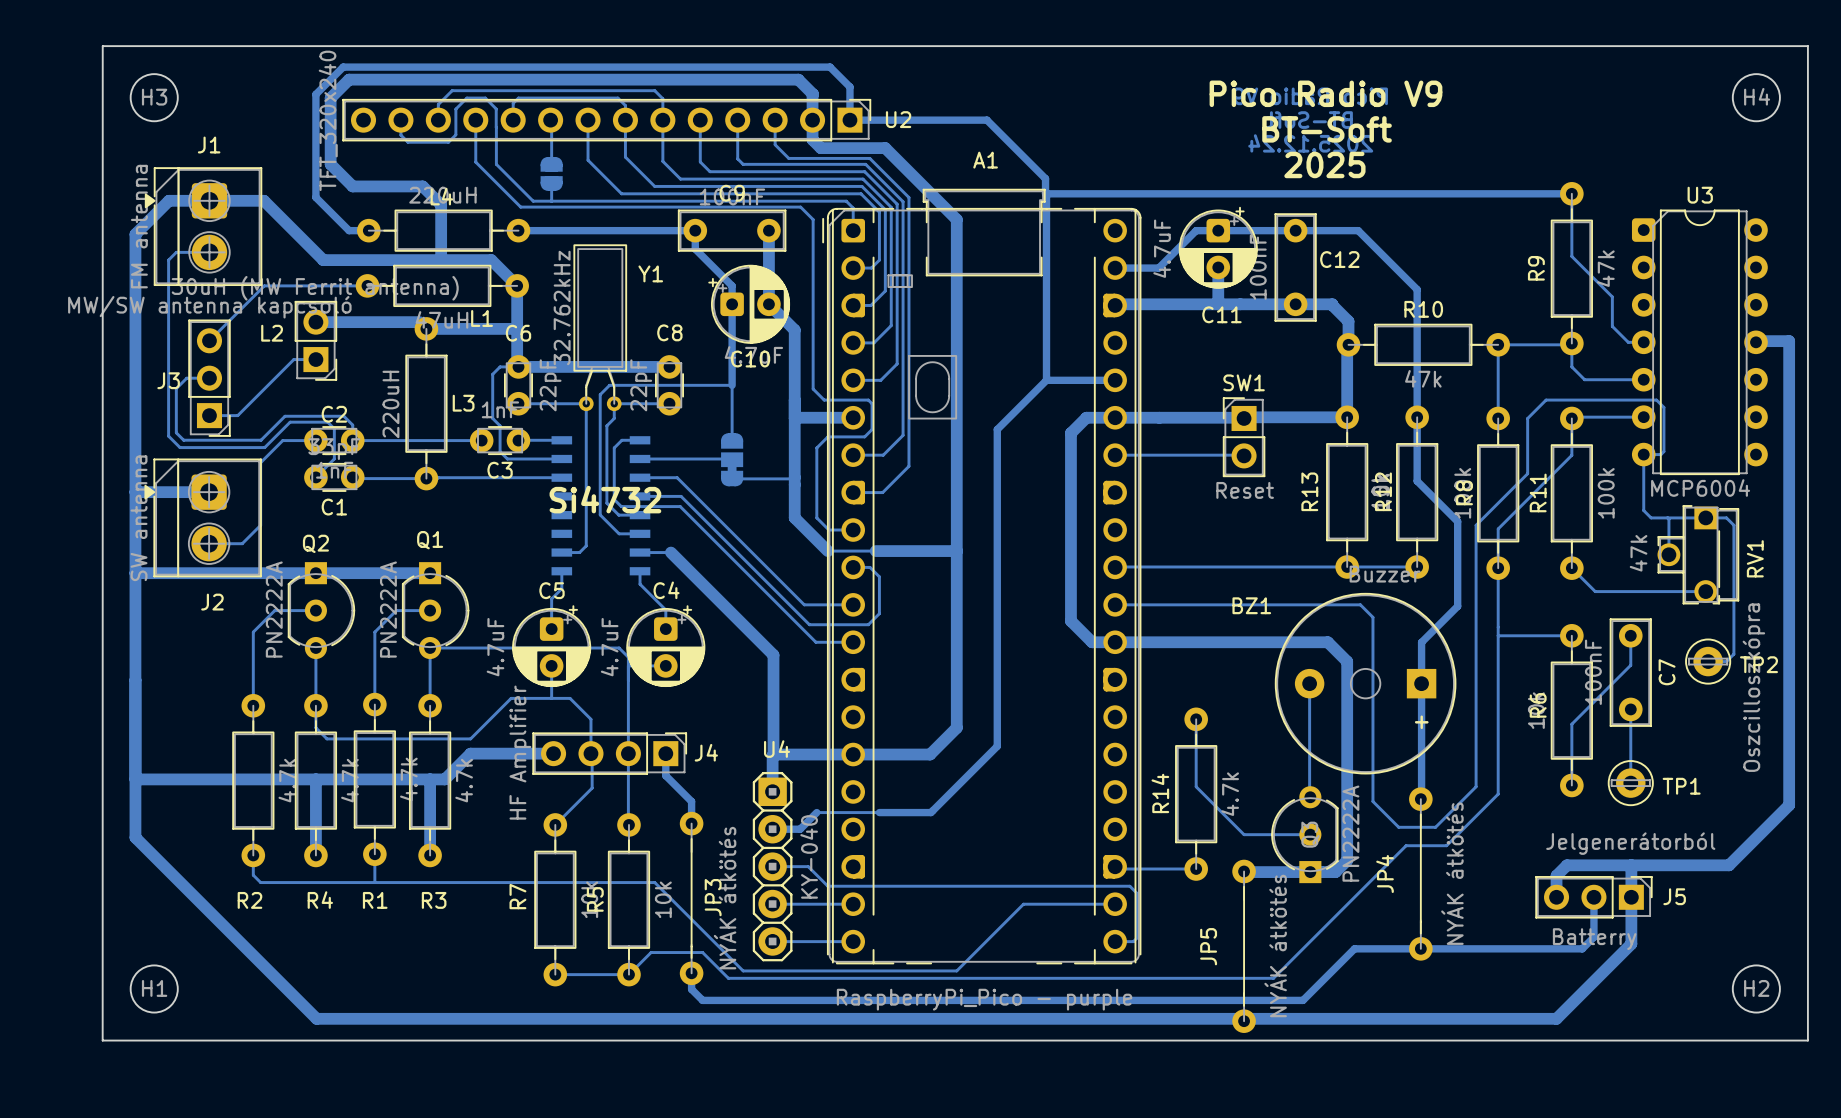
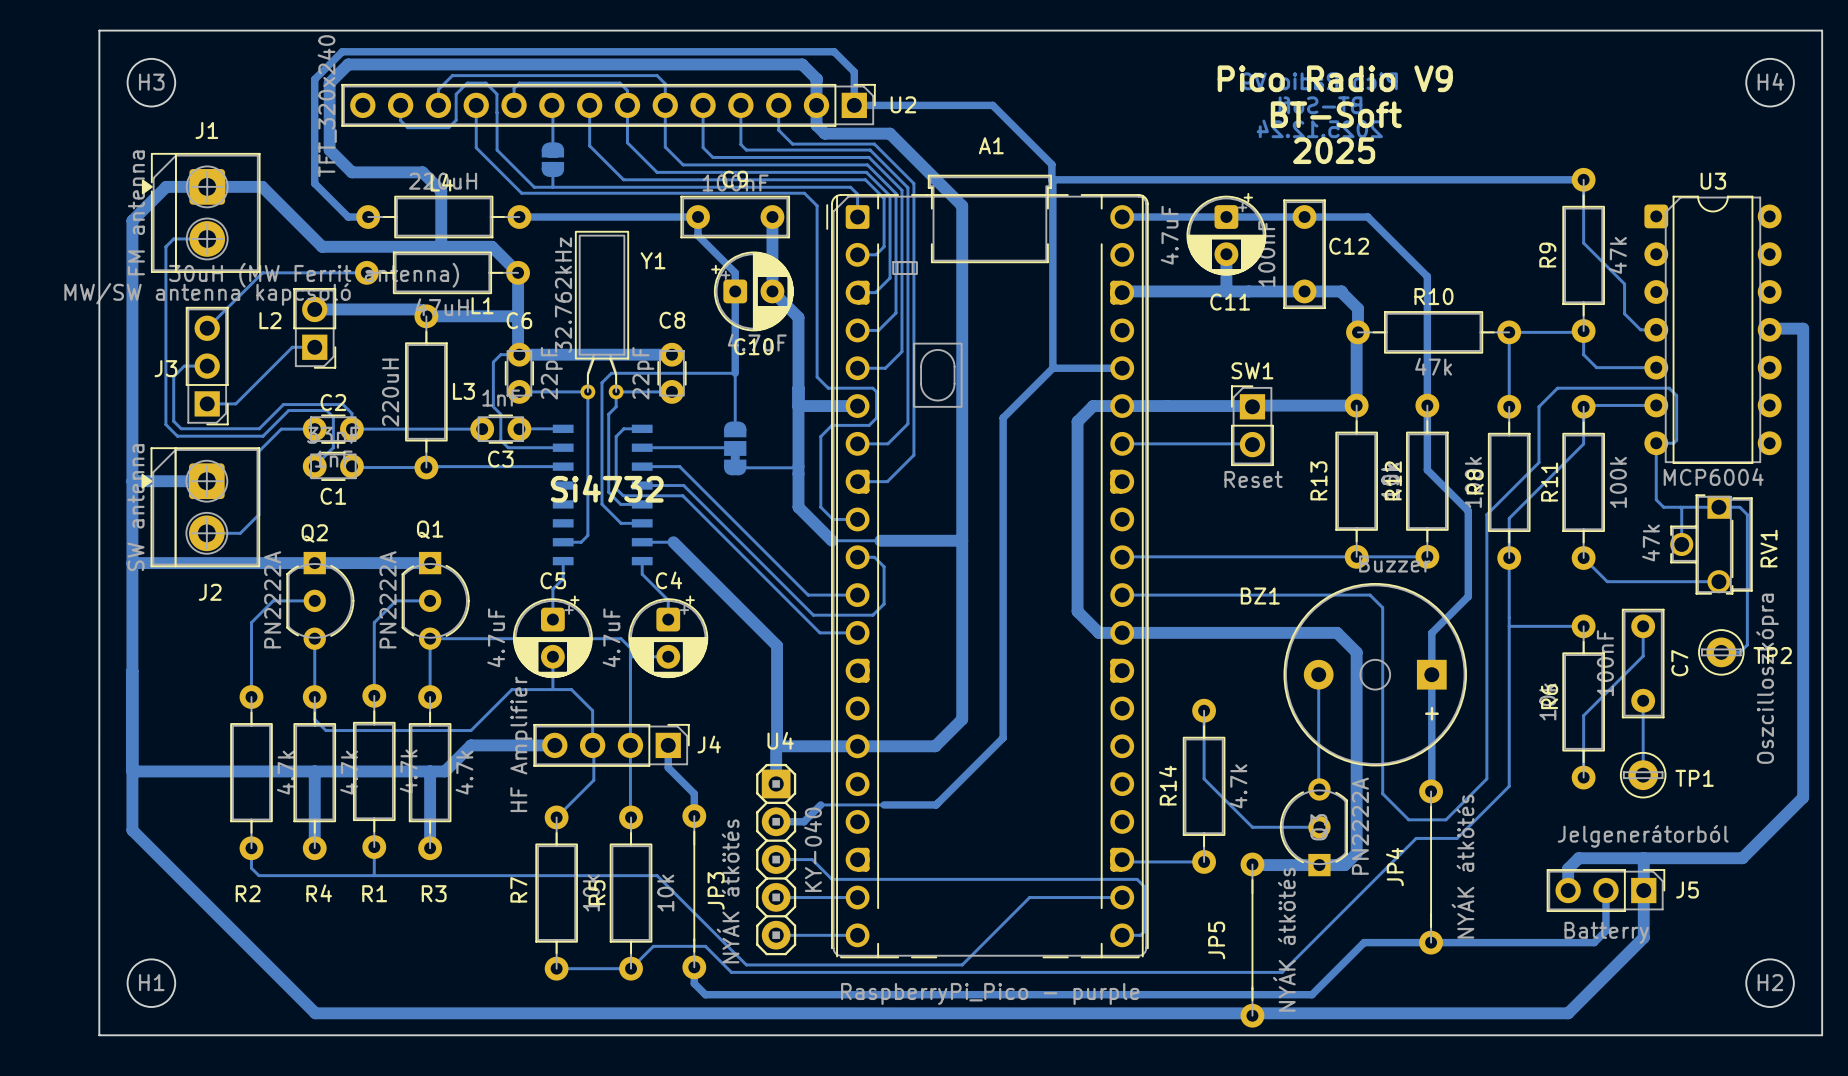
bottom track: (1196, 230) (1158, 268) (1115, 268) -> (1204, 217) (1122, 217)

